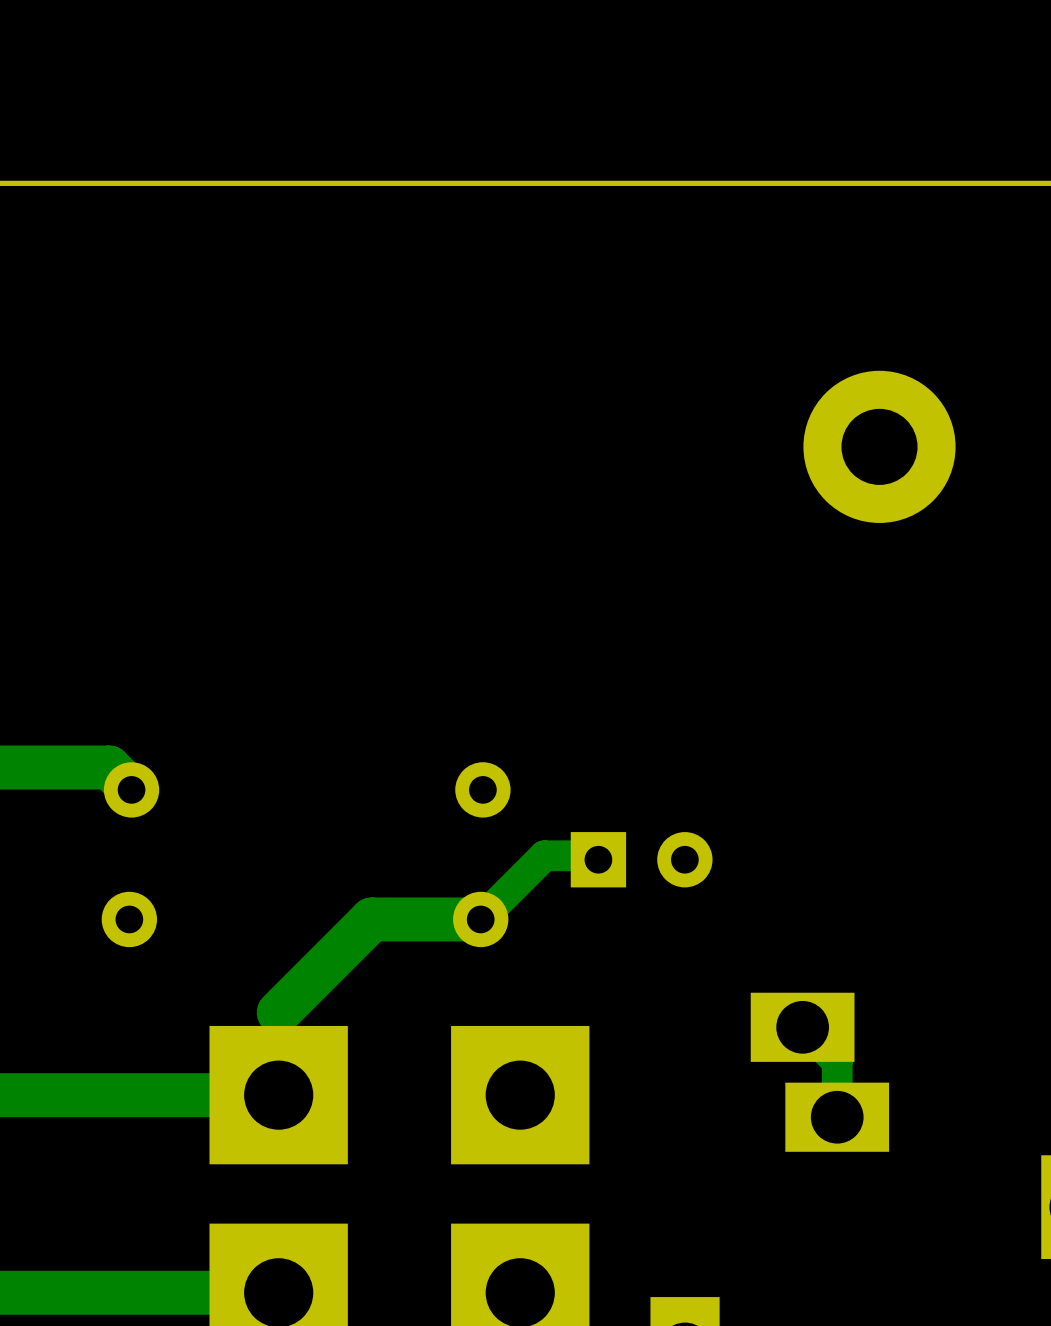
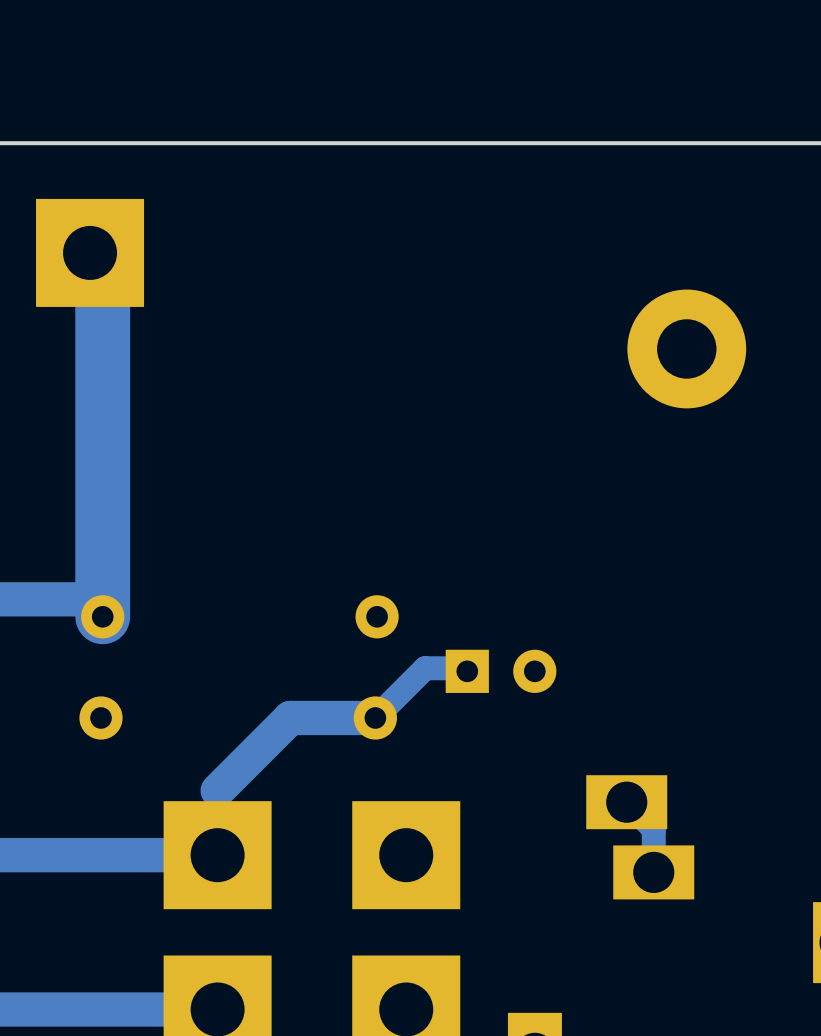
bottom track: none -> (90, 252) (102, 265) (102, 616)
part: none -> (90, 252)

